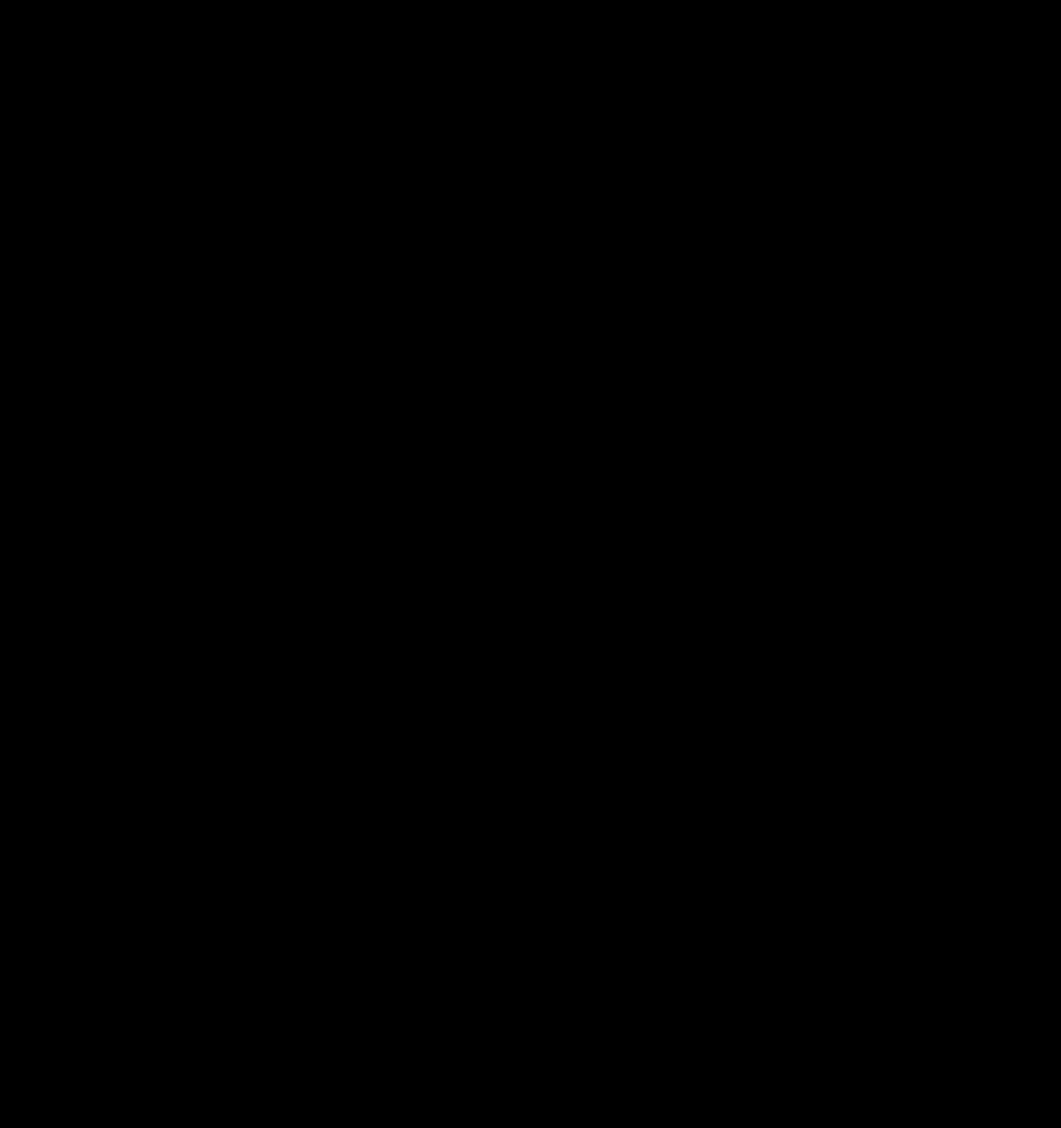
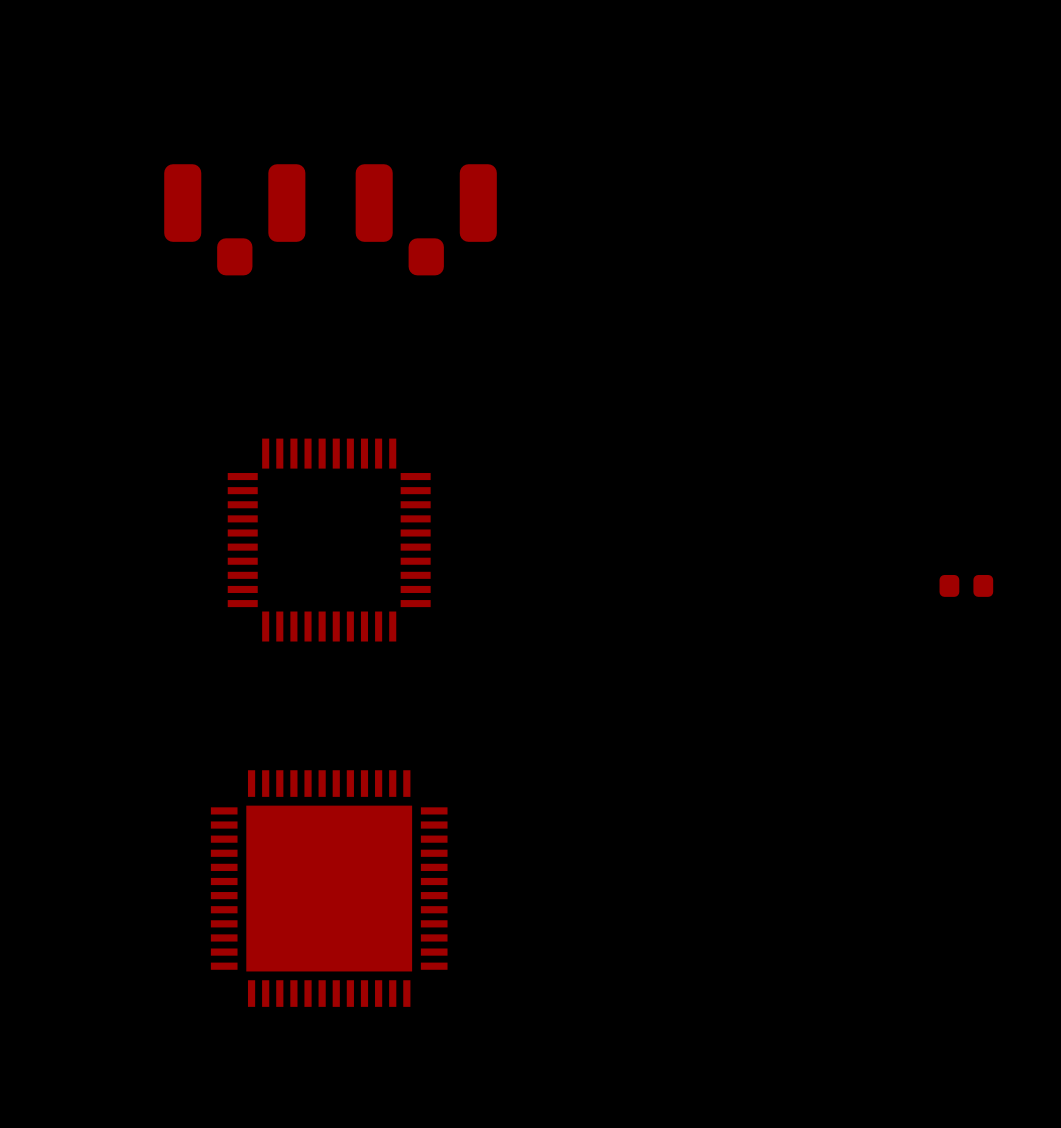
part: none -> (234, 219)
part: none -> (426, 219)
part: none -> (329, 540)
part: none -> (966, 585)
part: none -> (329, 888)

